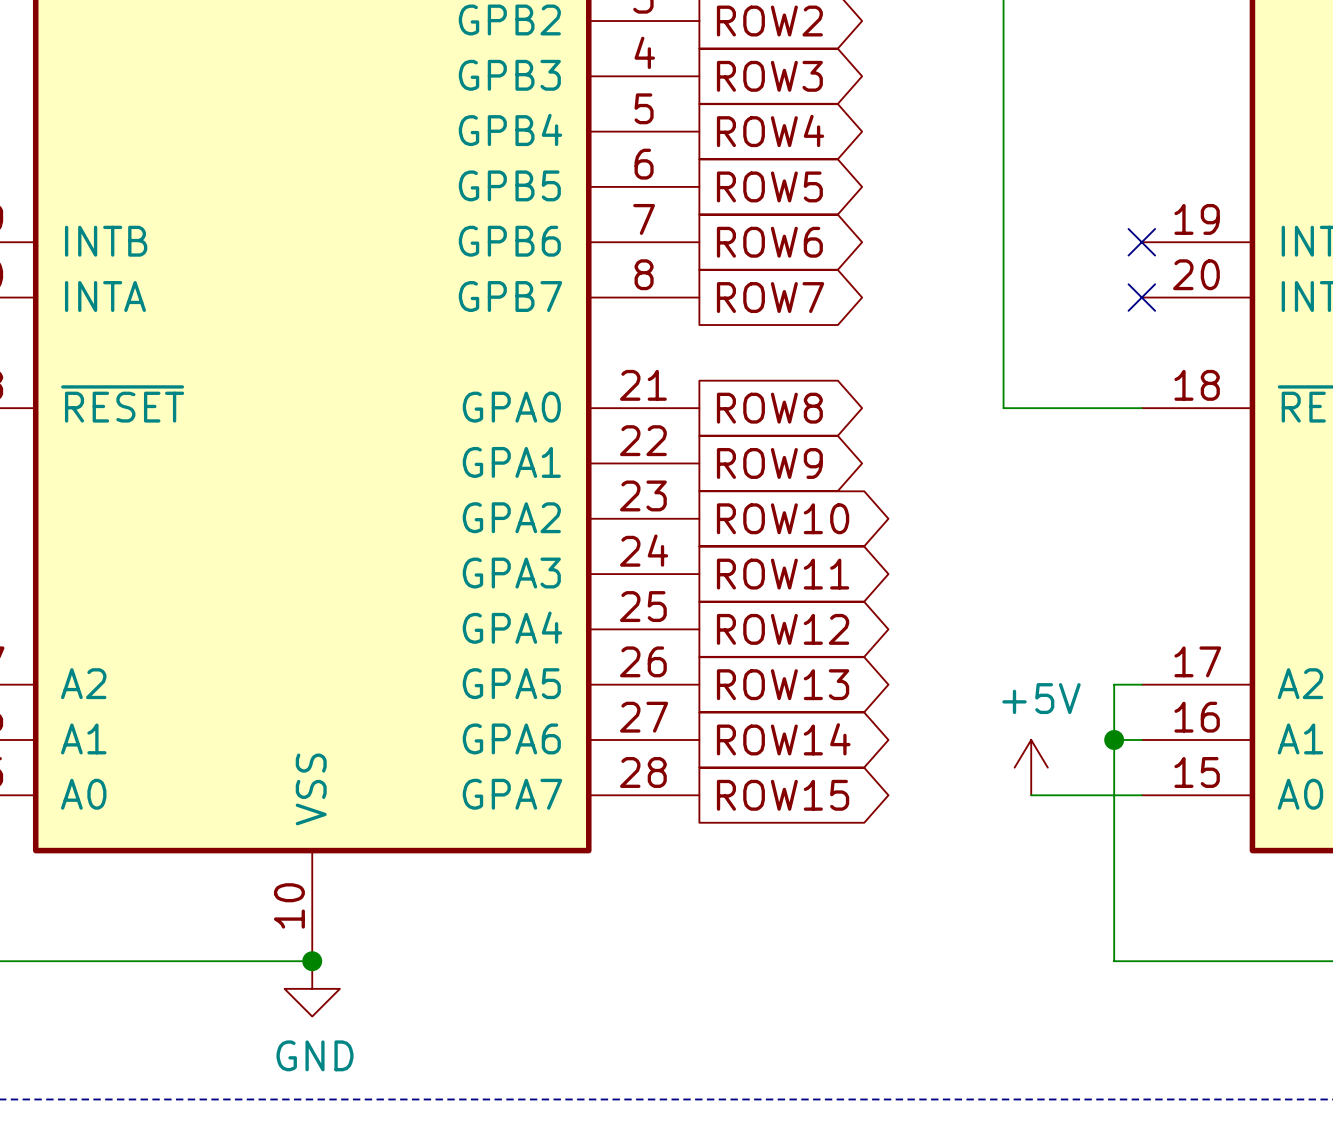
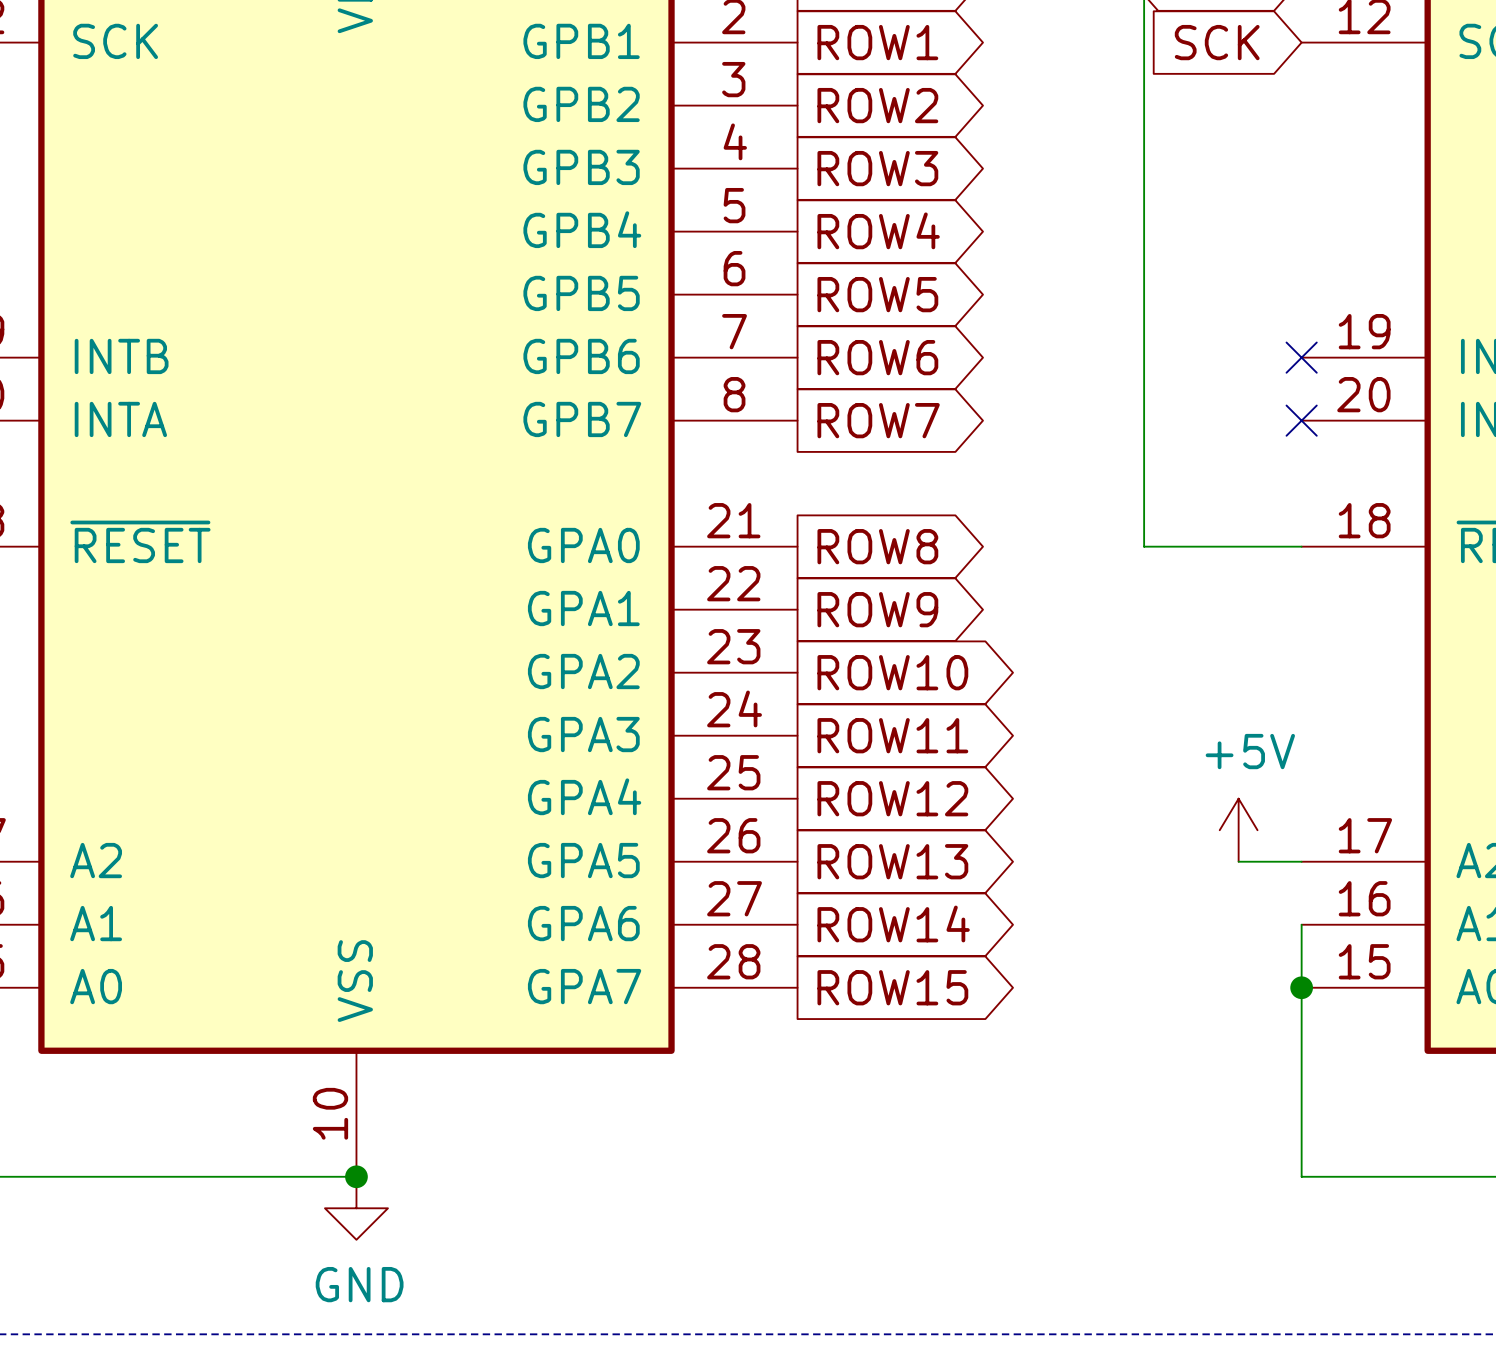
wire: (1114, 684) (1114, 961) (1141, 961) -> (1301, 924) (1301, 1176)
wire: (1114, 739) (1141, 739) -> (1238, 861) (1270, 861)
junction position: (1114, 739) -> (1301, 987)
power symbol position: +5V (1031, 767) -> +5V (1238, 830)
wire: (1031, 795) (1141, 795) -> none

